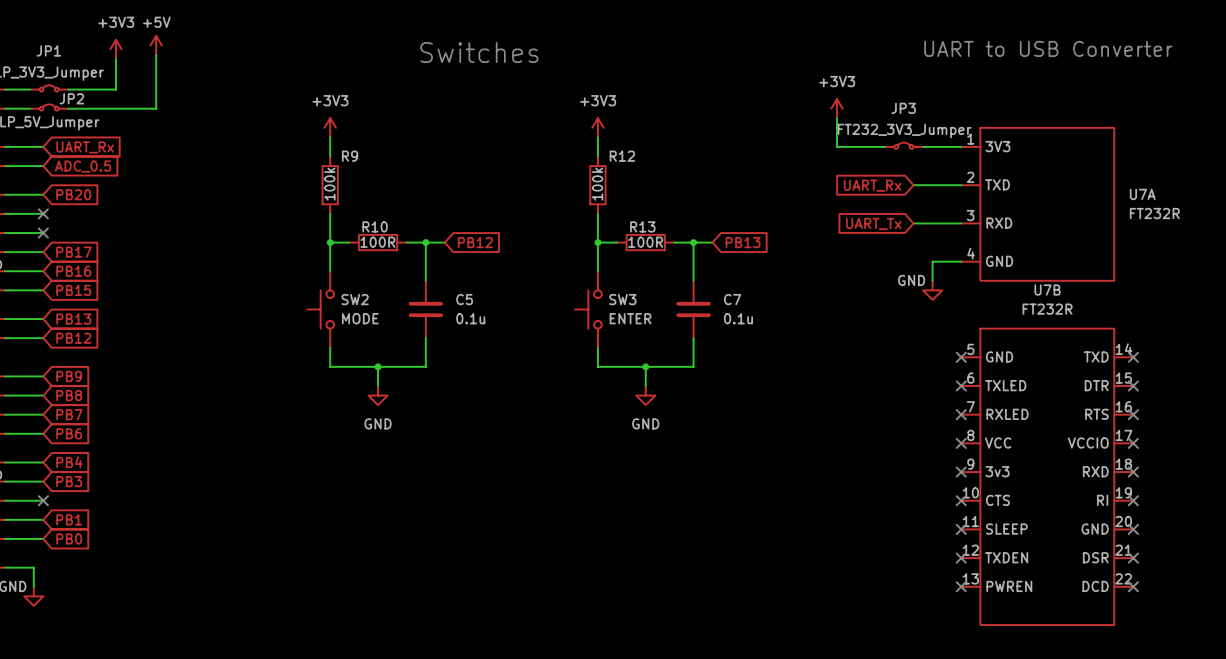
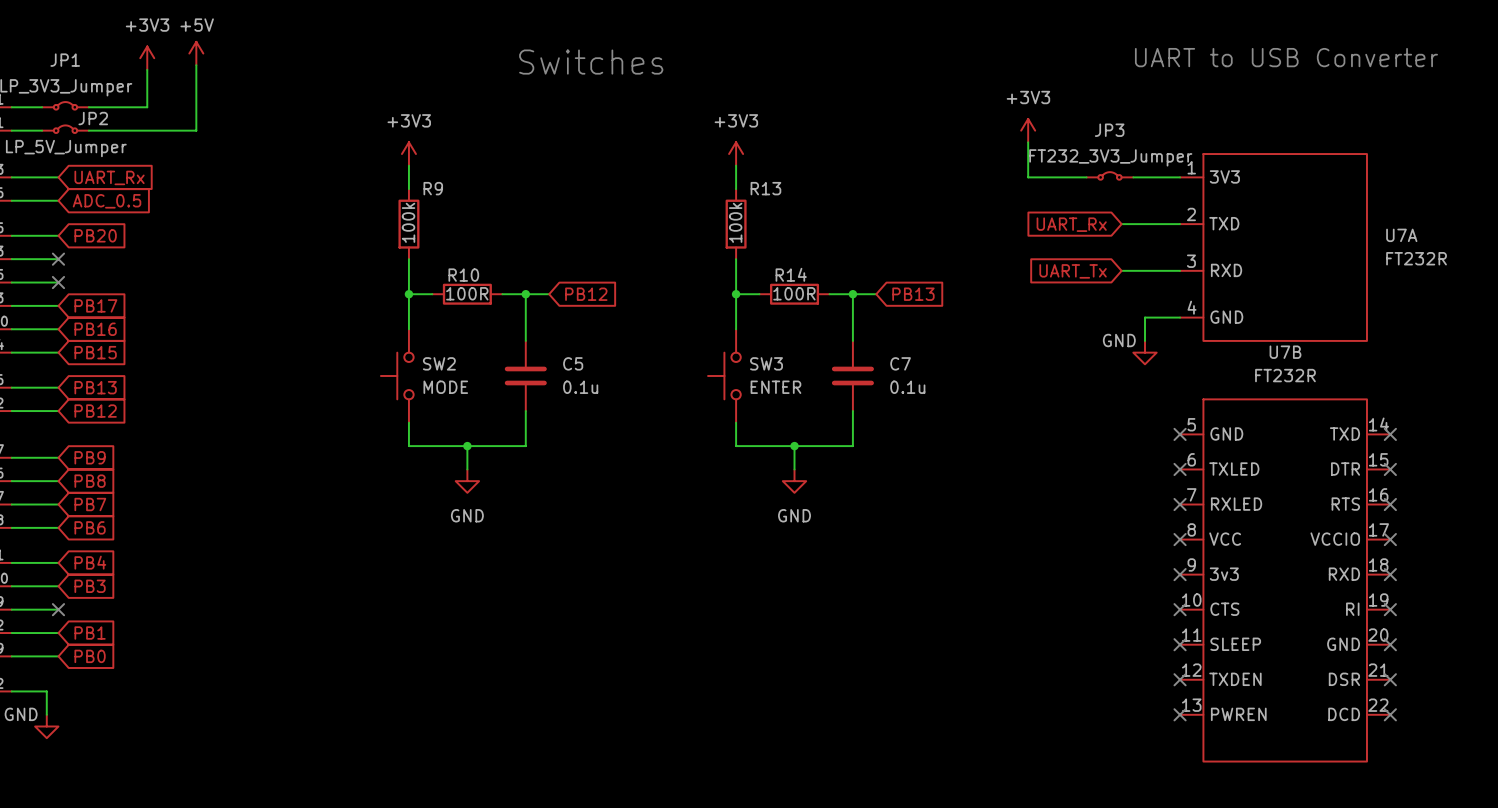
R12 name: R12 (622, 156) -> R13 (765, 188)
R13 name: R13 (642, 226) -> R14 (791, 274)

